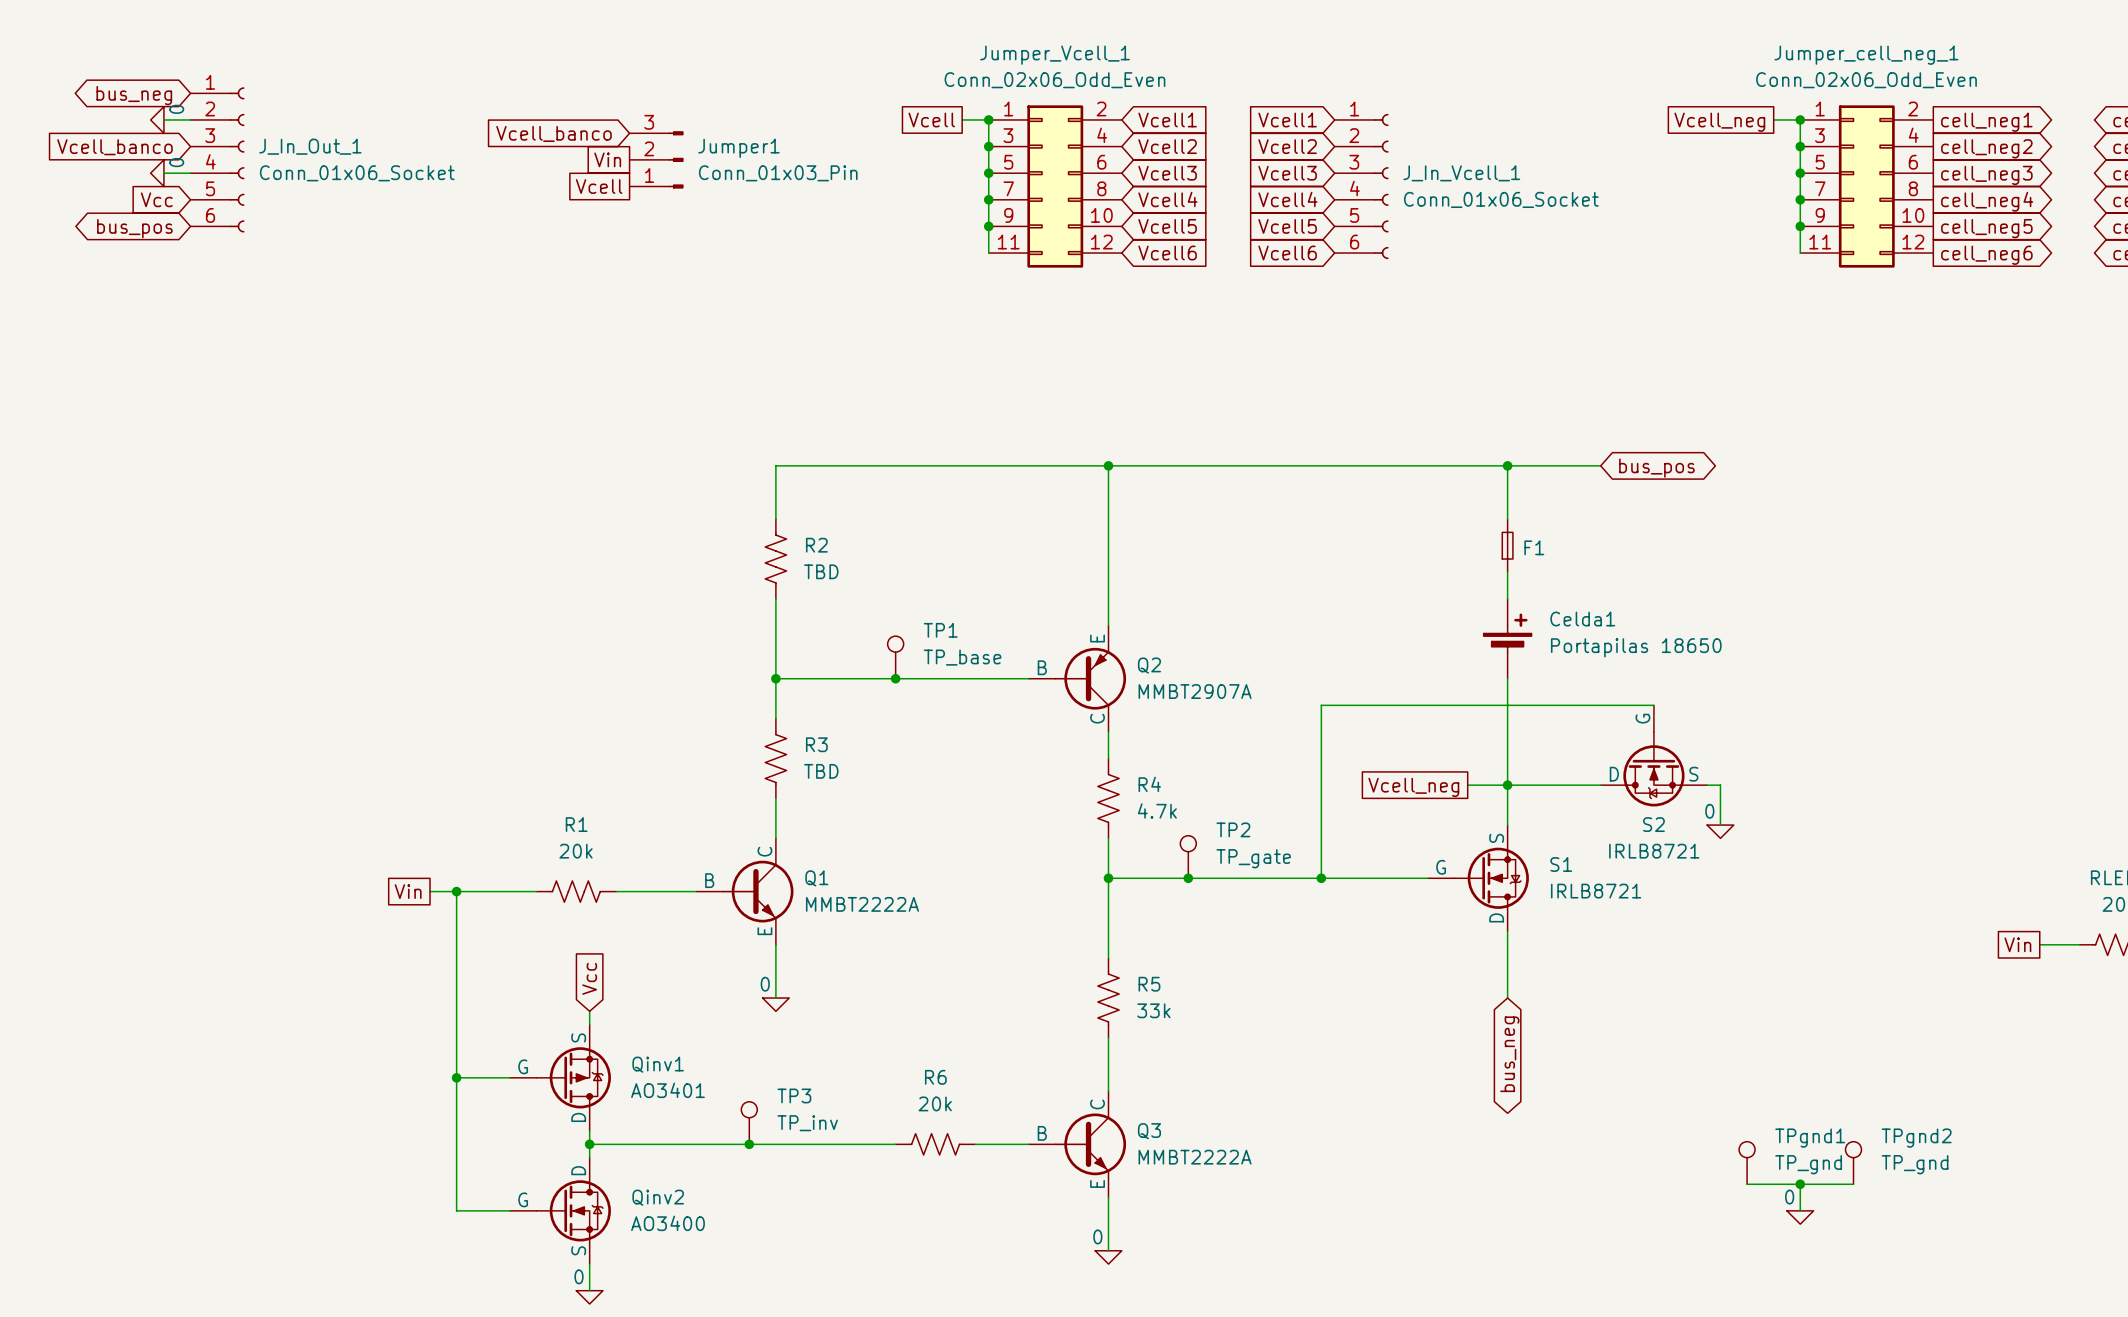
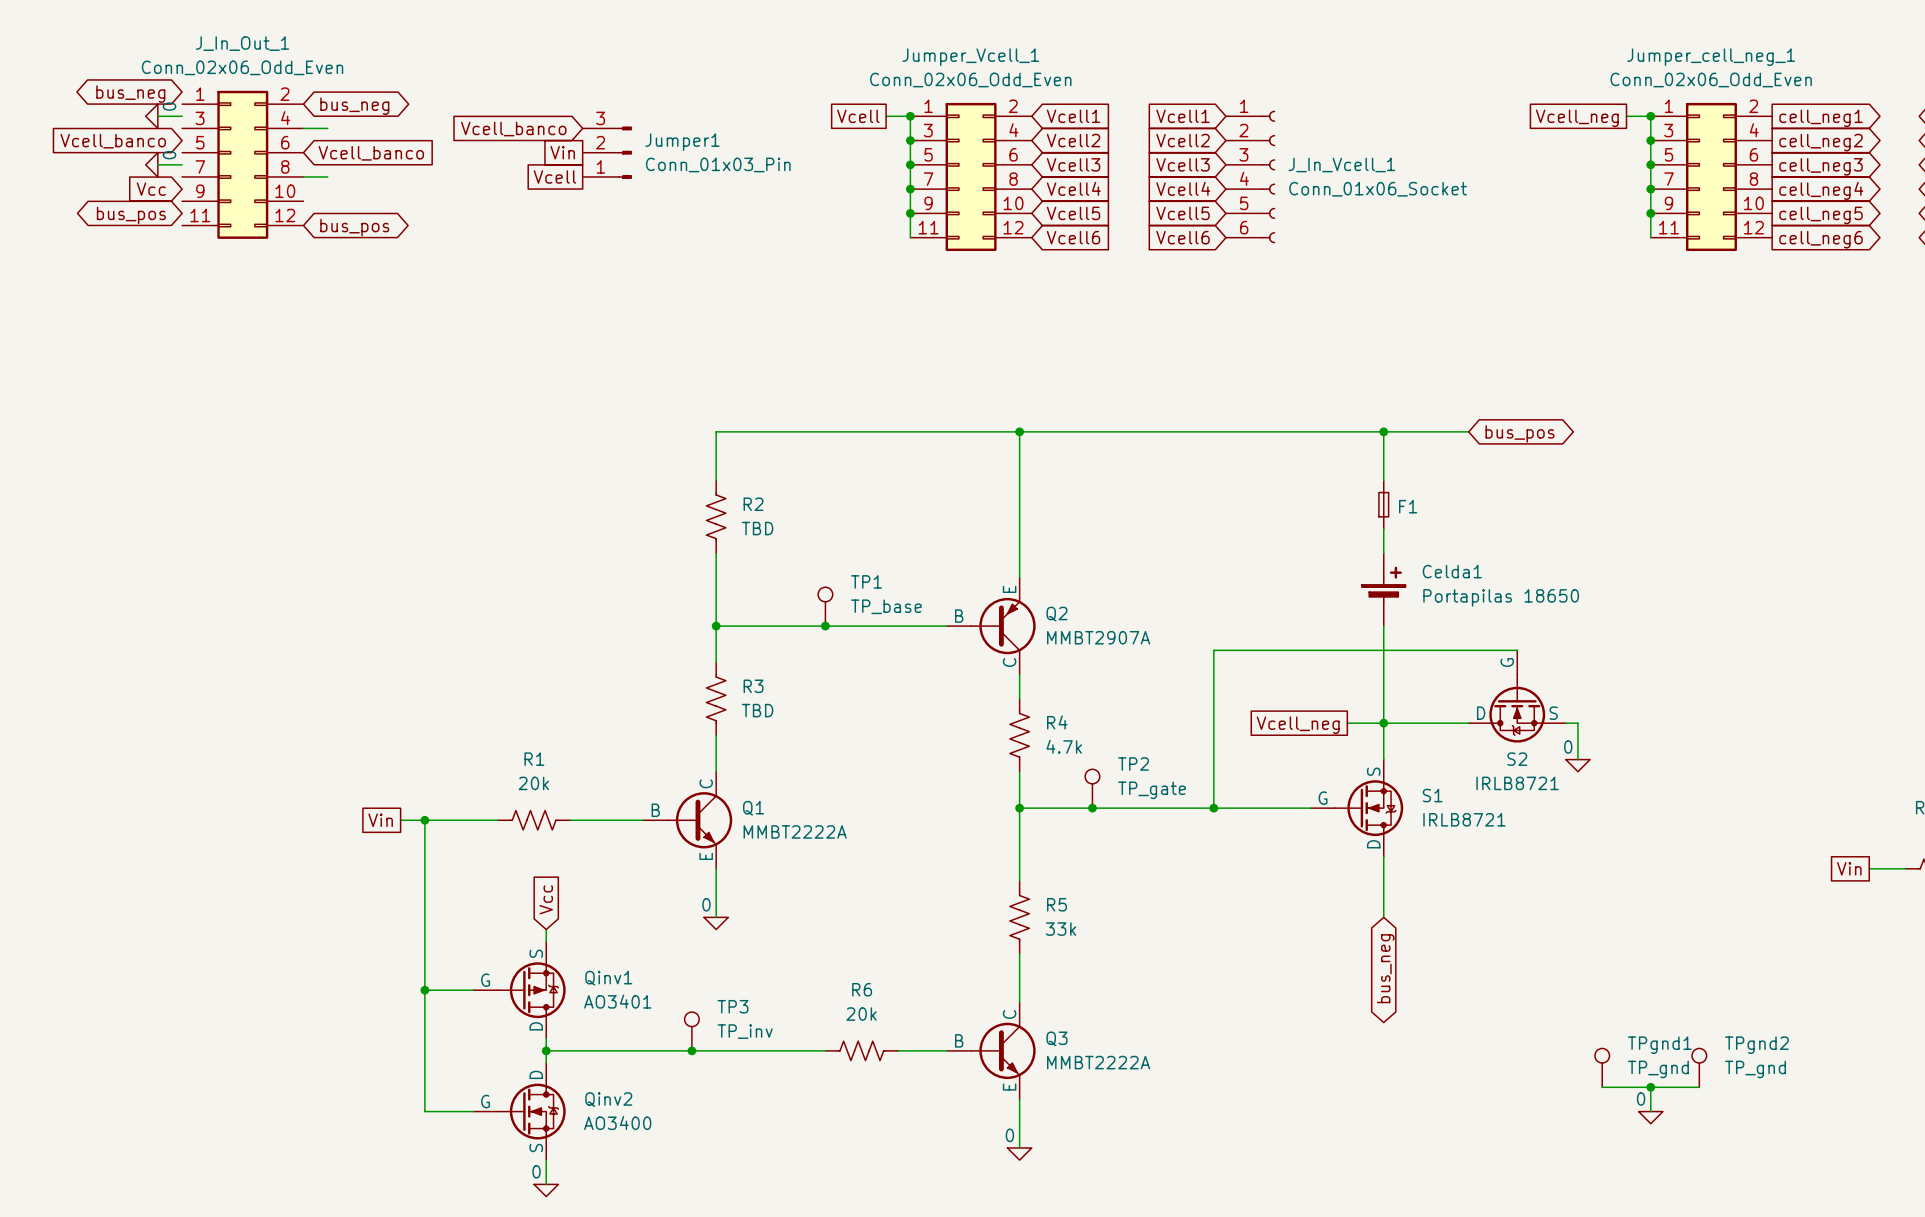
J_In_Out_1 symbol: [190, 87, 245, 233] -> [182, 90, 304, 239]
global label: none -> bus_neg (354, 106)
wire: none -> (303, 128) (327, 128)
J_In_Out_1 name position: J_In_Out_1 (310, 146) -> J_In_Out_1 (242, 43)
global label: none -> Vcell_banco (371, 153)
J_In_Out_1 value: Conn_01x06_Socket (357, 173) -> Conn_02x06_Odd_Even (242, 67)
wire: none -> (303, 176) (327, 176)
global label: none -> bus_pos (354, 227)

